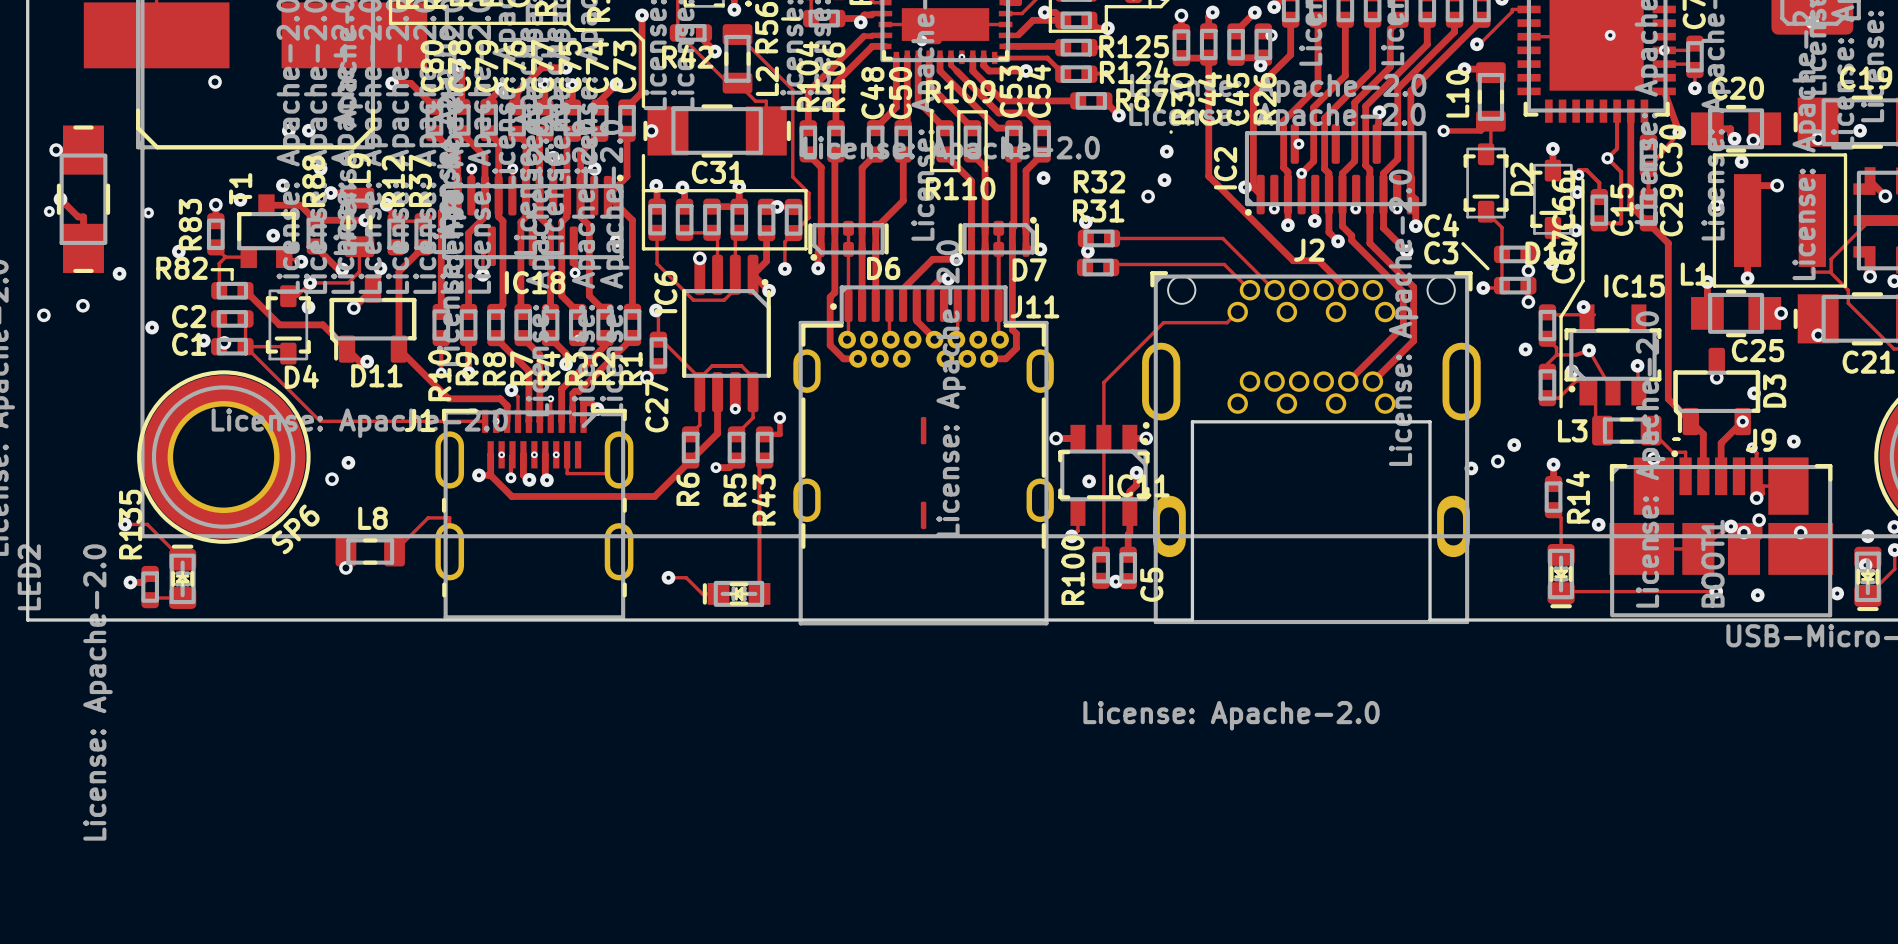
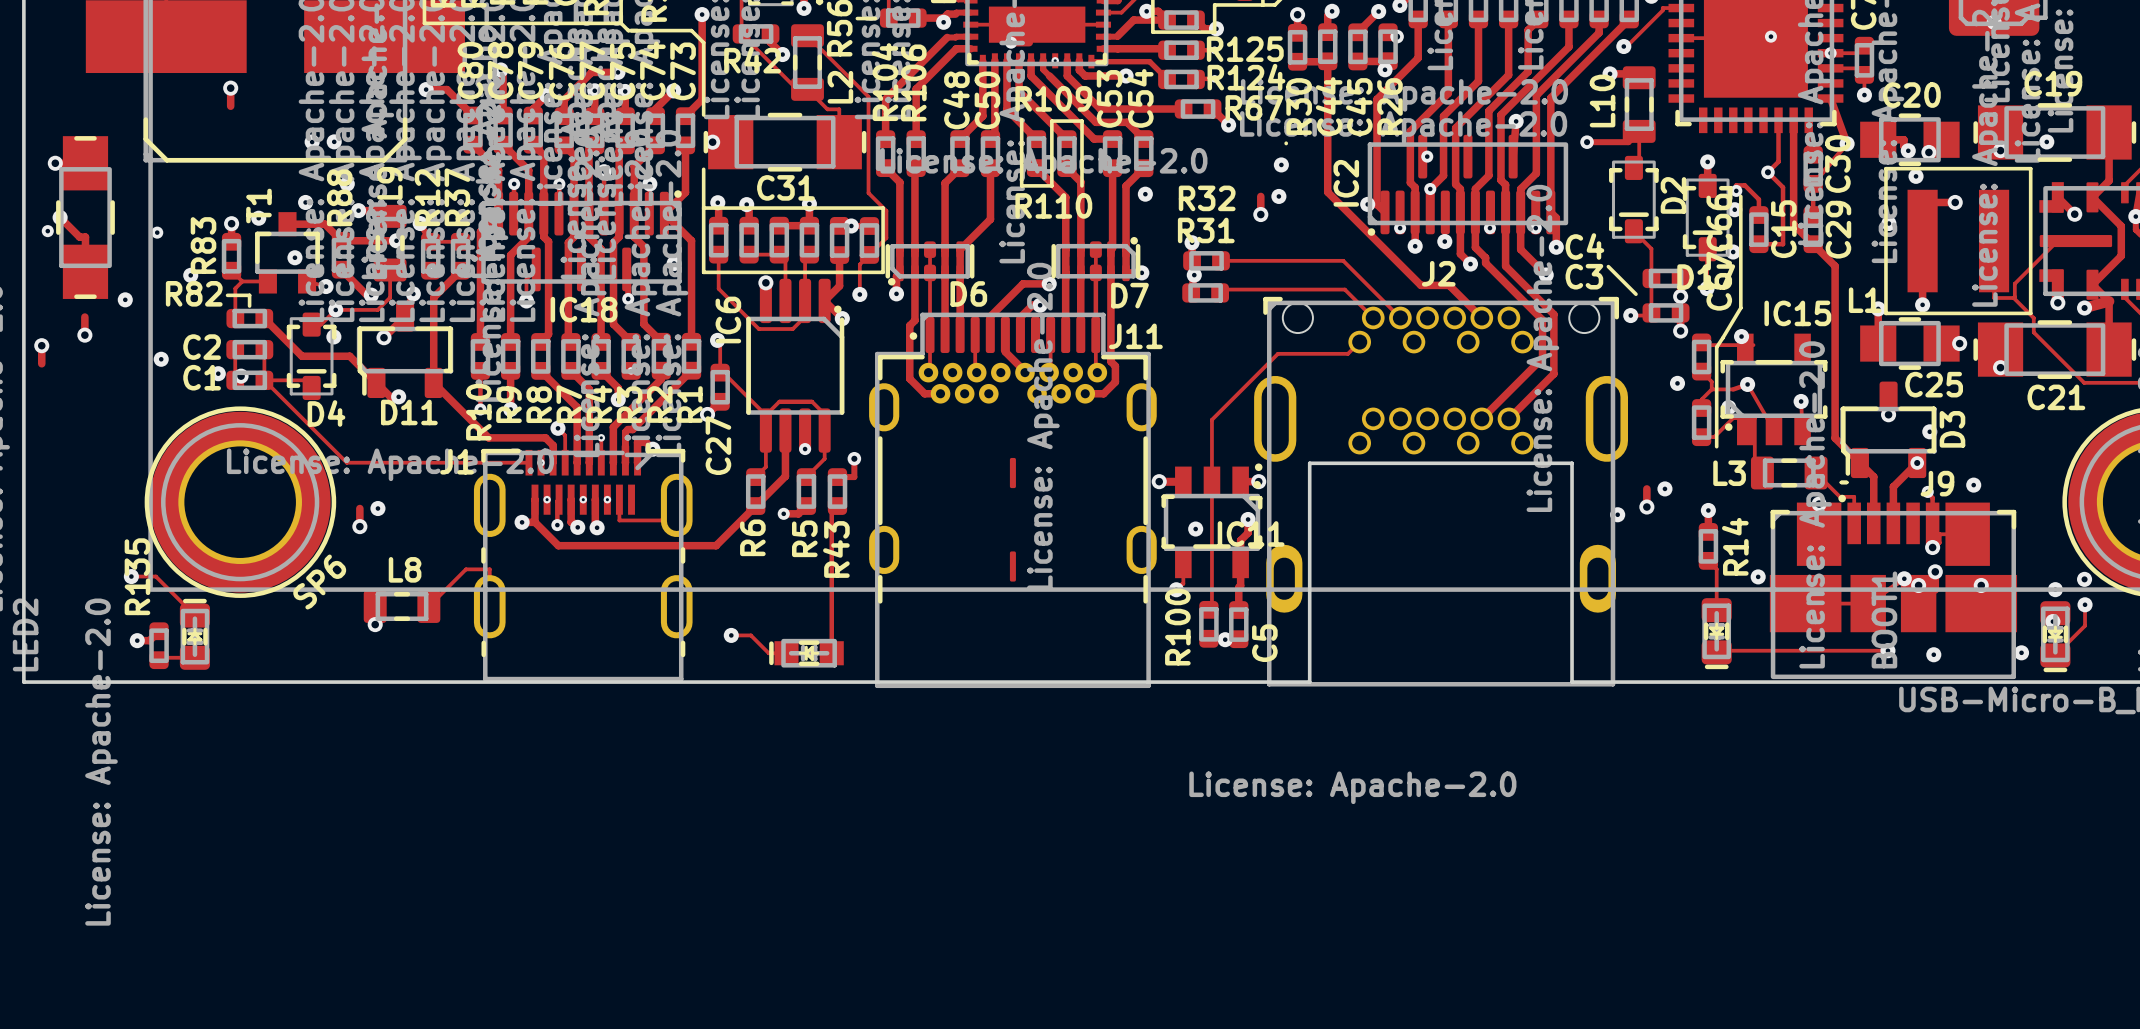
track: none -> (230, 88) (230, 106)
track: none -> (1260, 196) (1260, 214)
track: none -> (84, 317) (84, 335)
track: none -> (41, 345) (41, 363)
track: none -> (1646, 488) (1646, 507)
track: none -> (359, 508) (359, 526)

